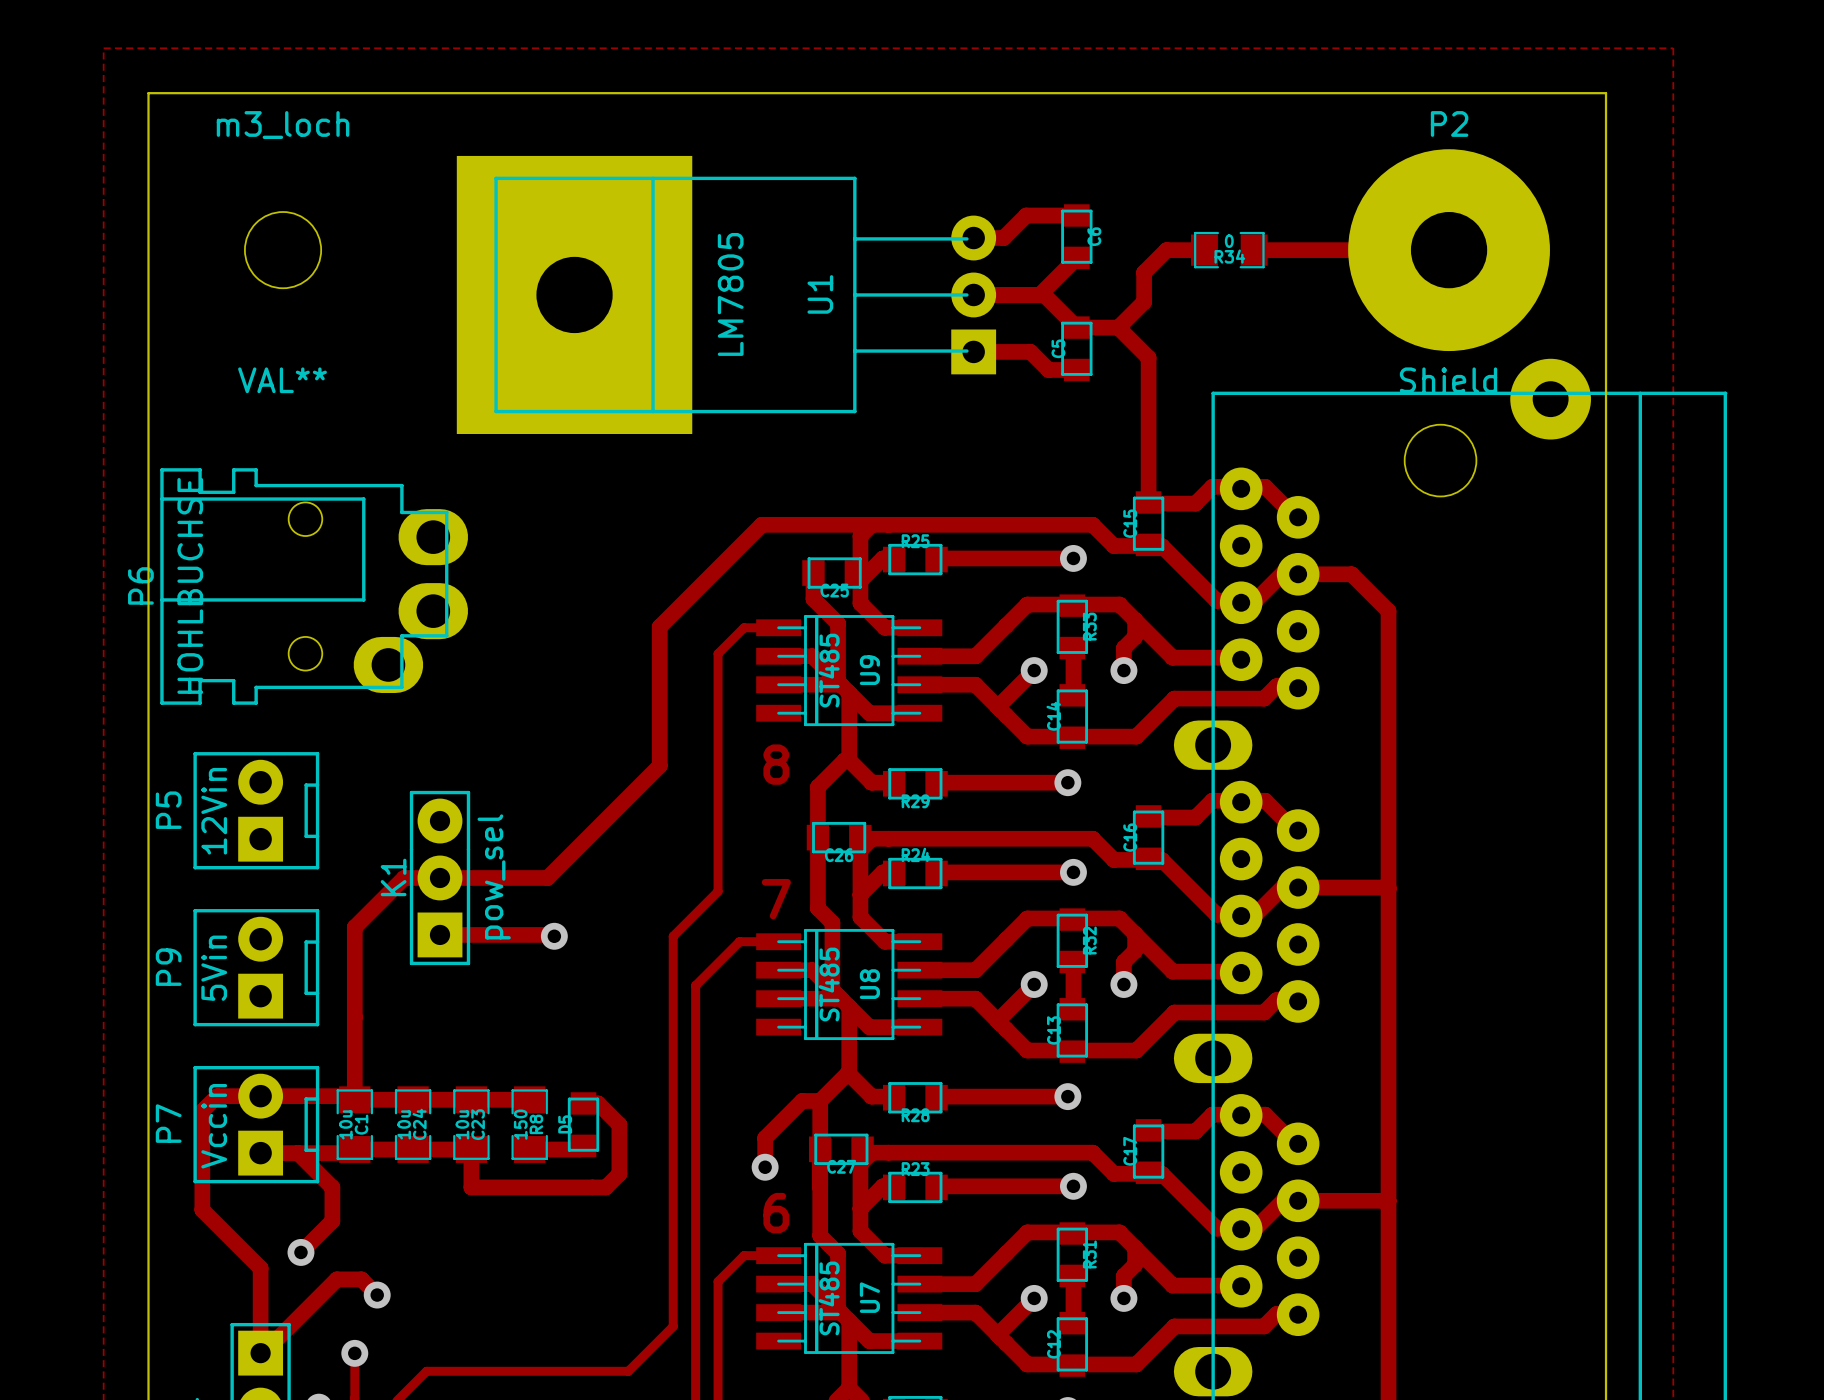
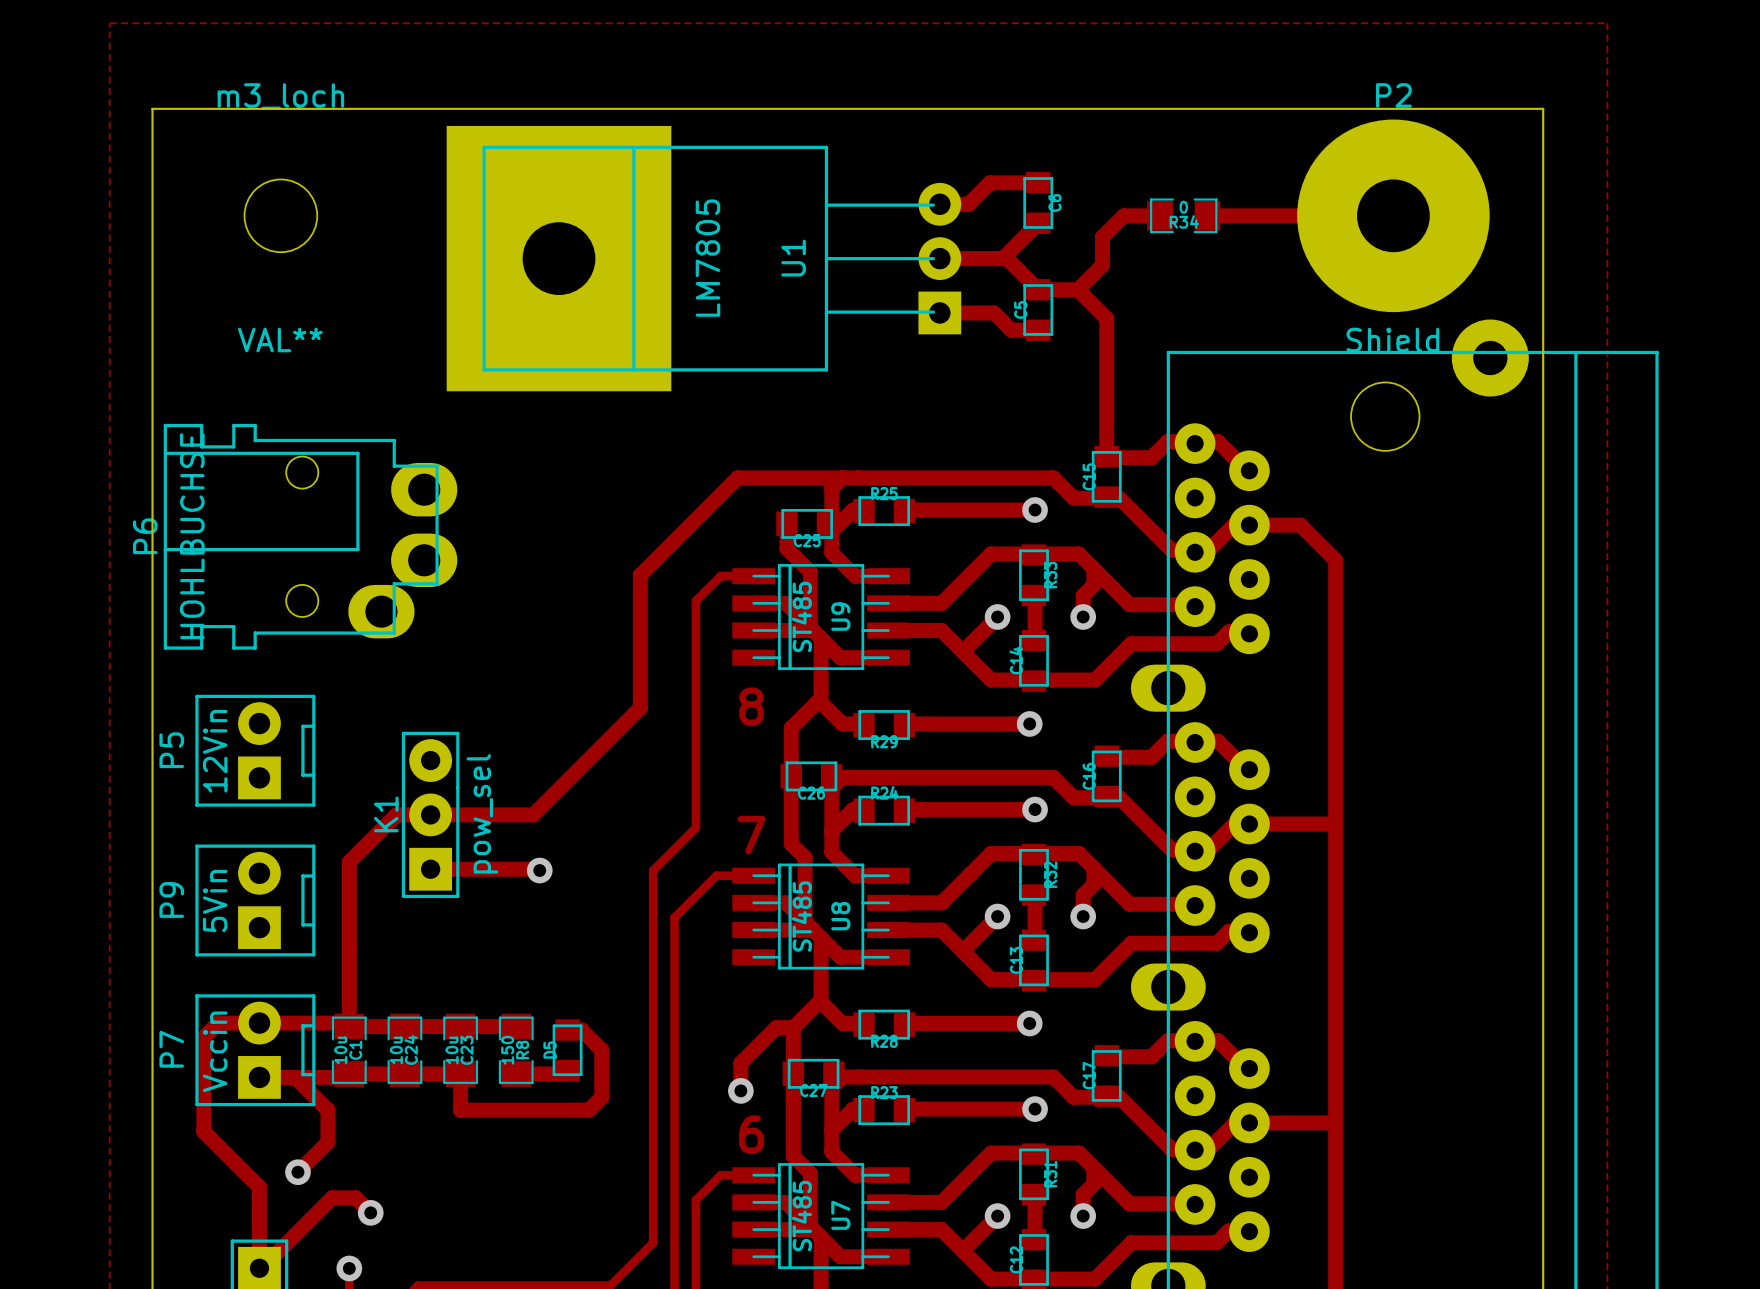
board edge: (148, 138) (148, 93) (1606, 93) (1606, 138) -> (152, 108) (1543, 108)

